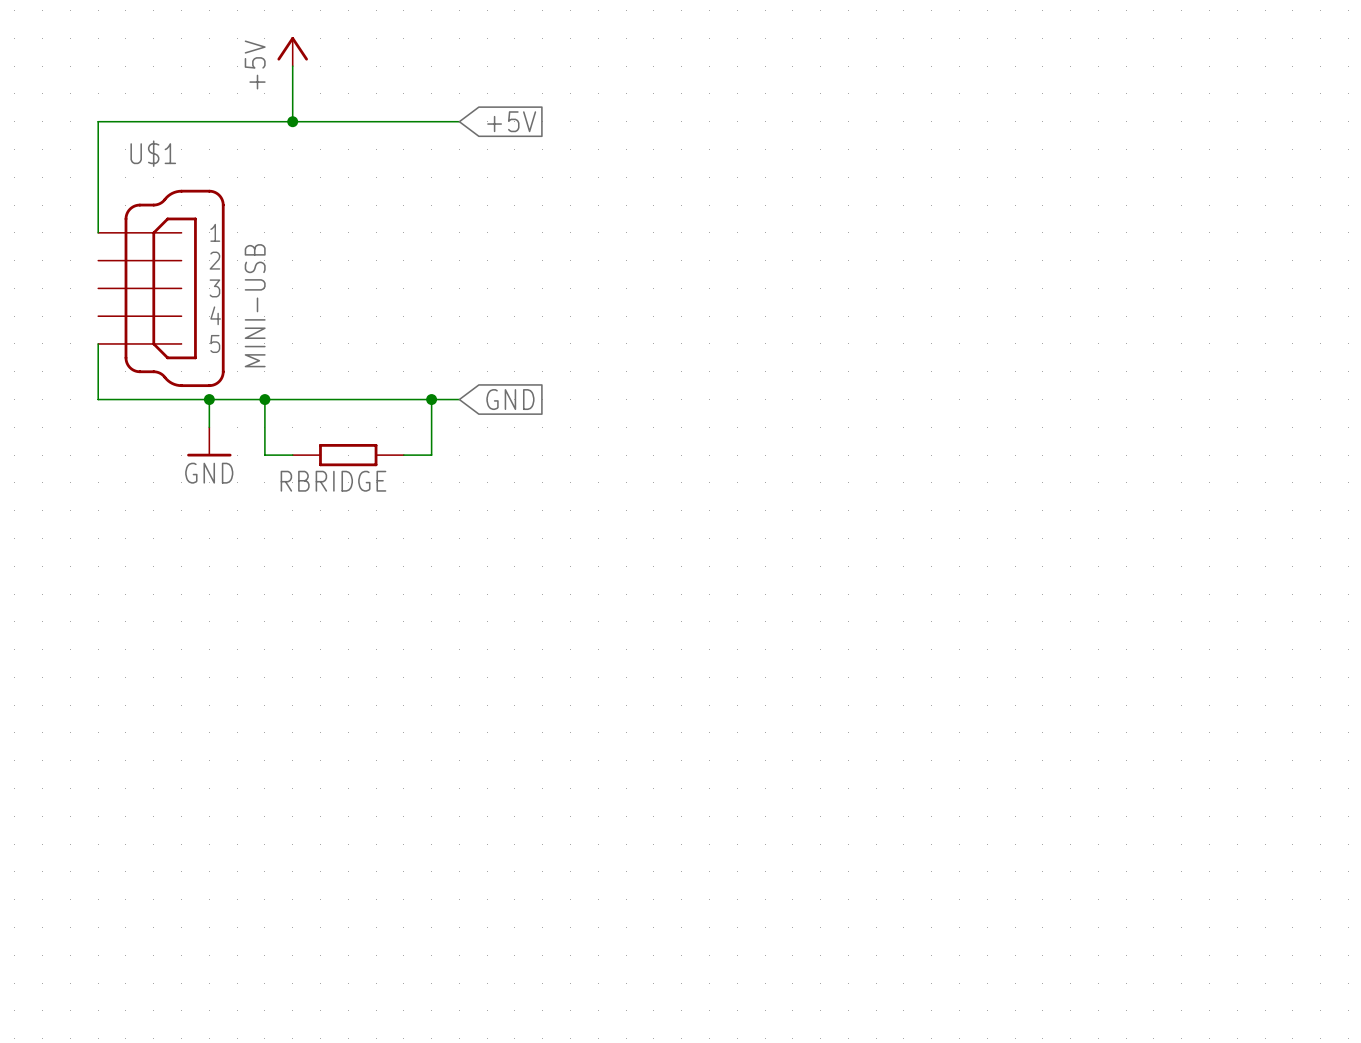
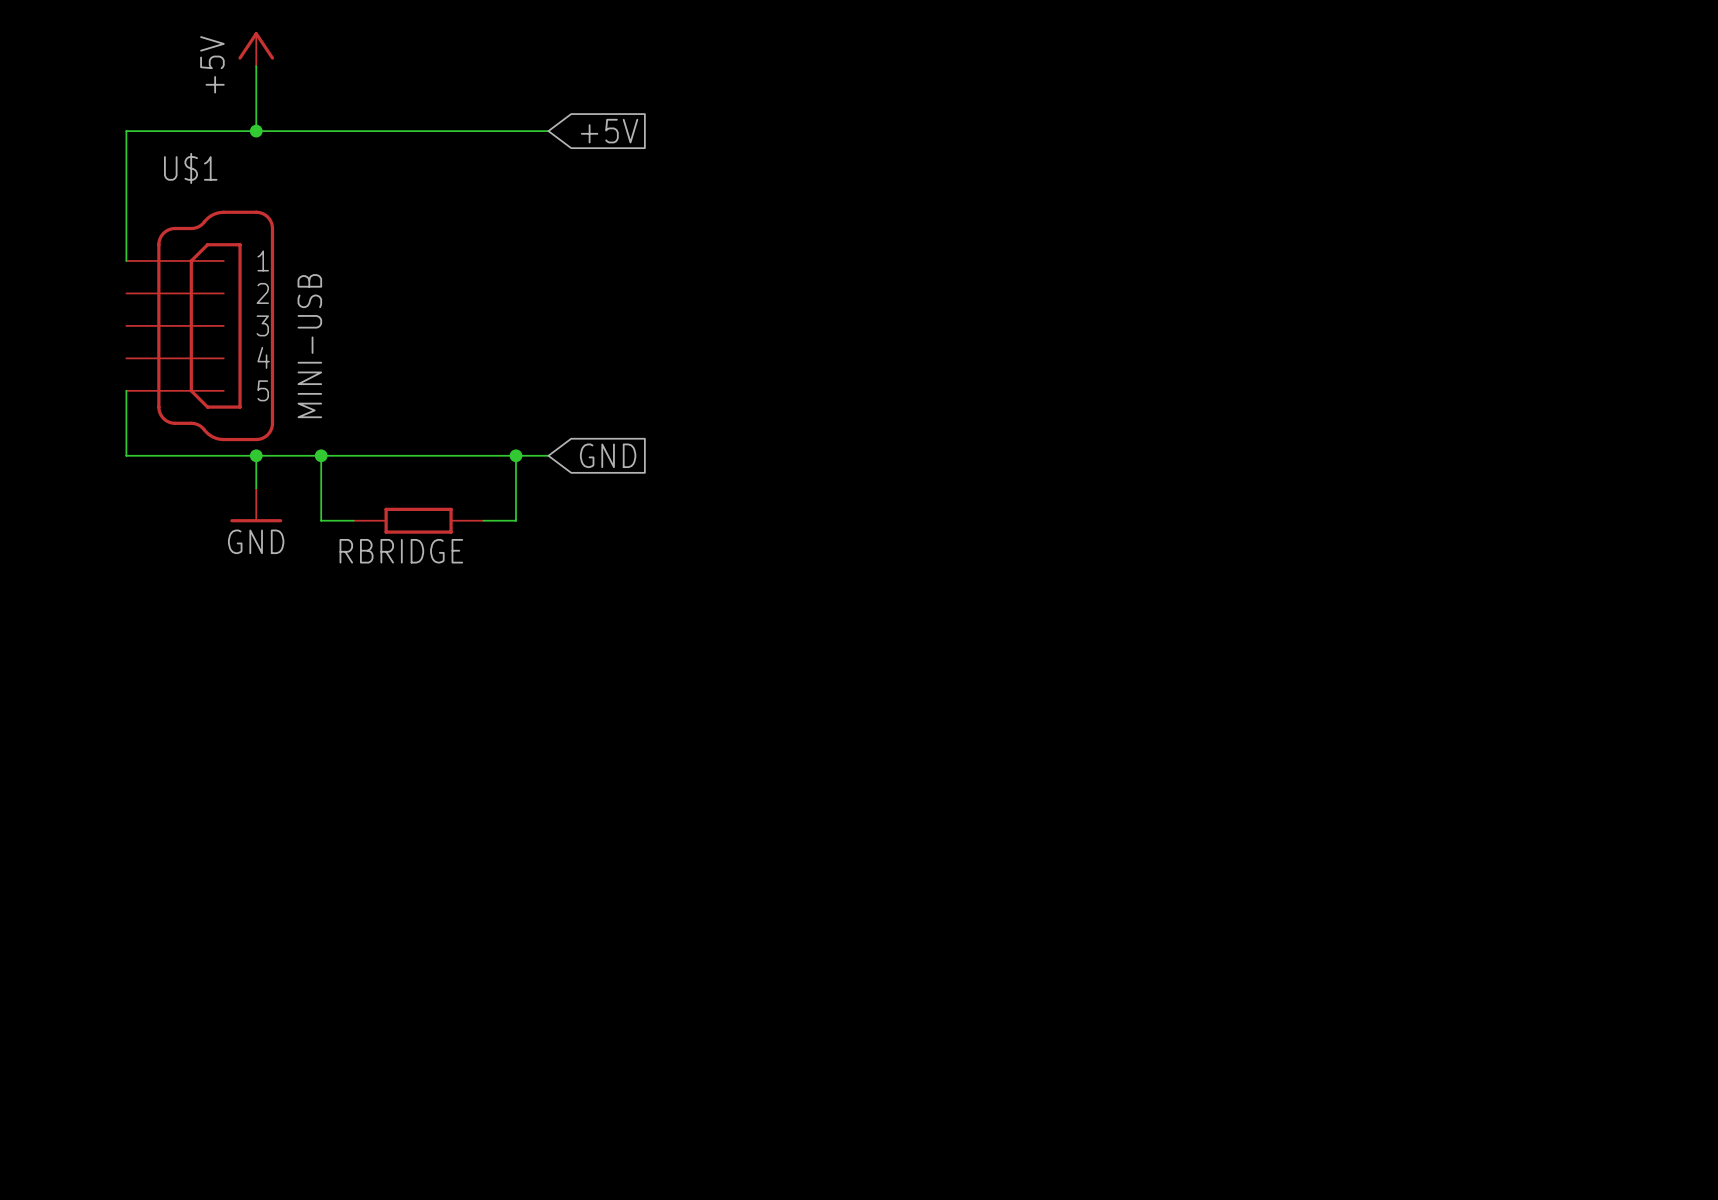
power symbol position: +5V (292, 51) -> +5V (256, 49)
wire: (292, 66) (292, 121) -> (256, 66) (256, 131)
junction: none -> (256, 131)
junction: (292, 121) -> none

